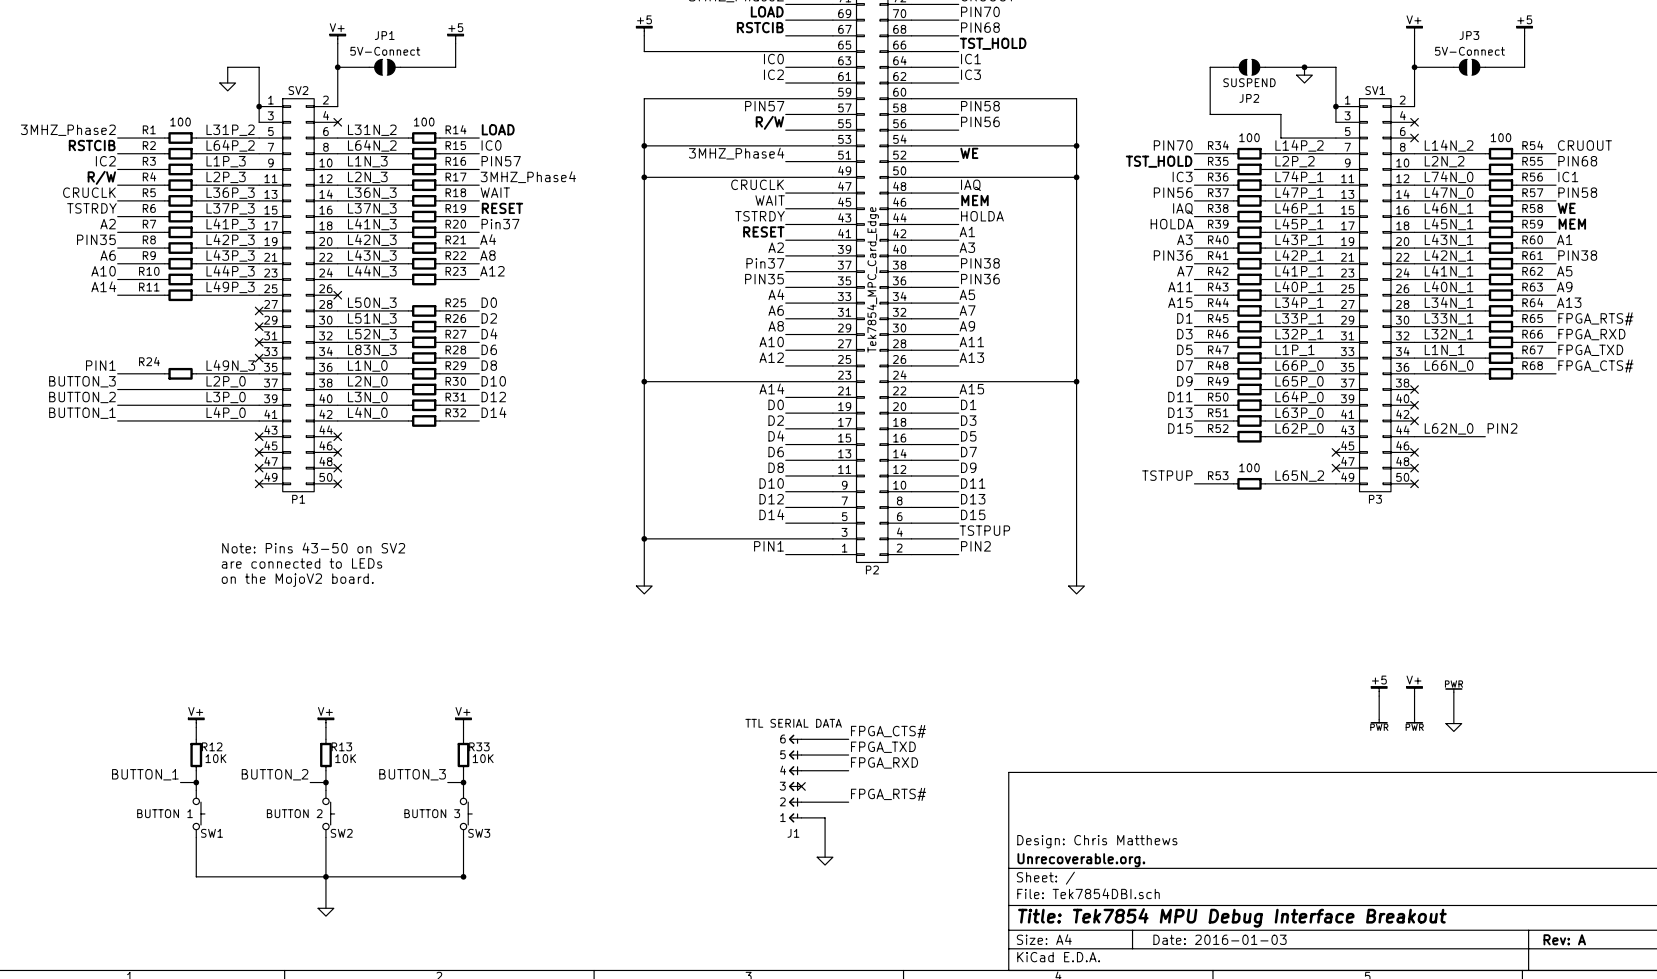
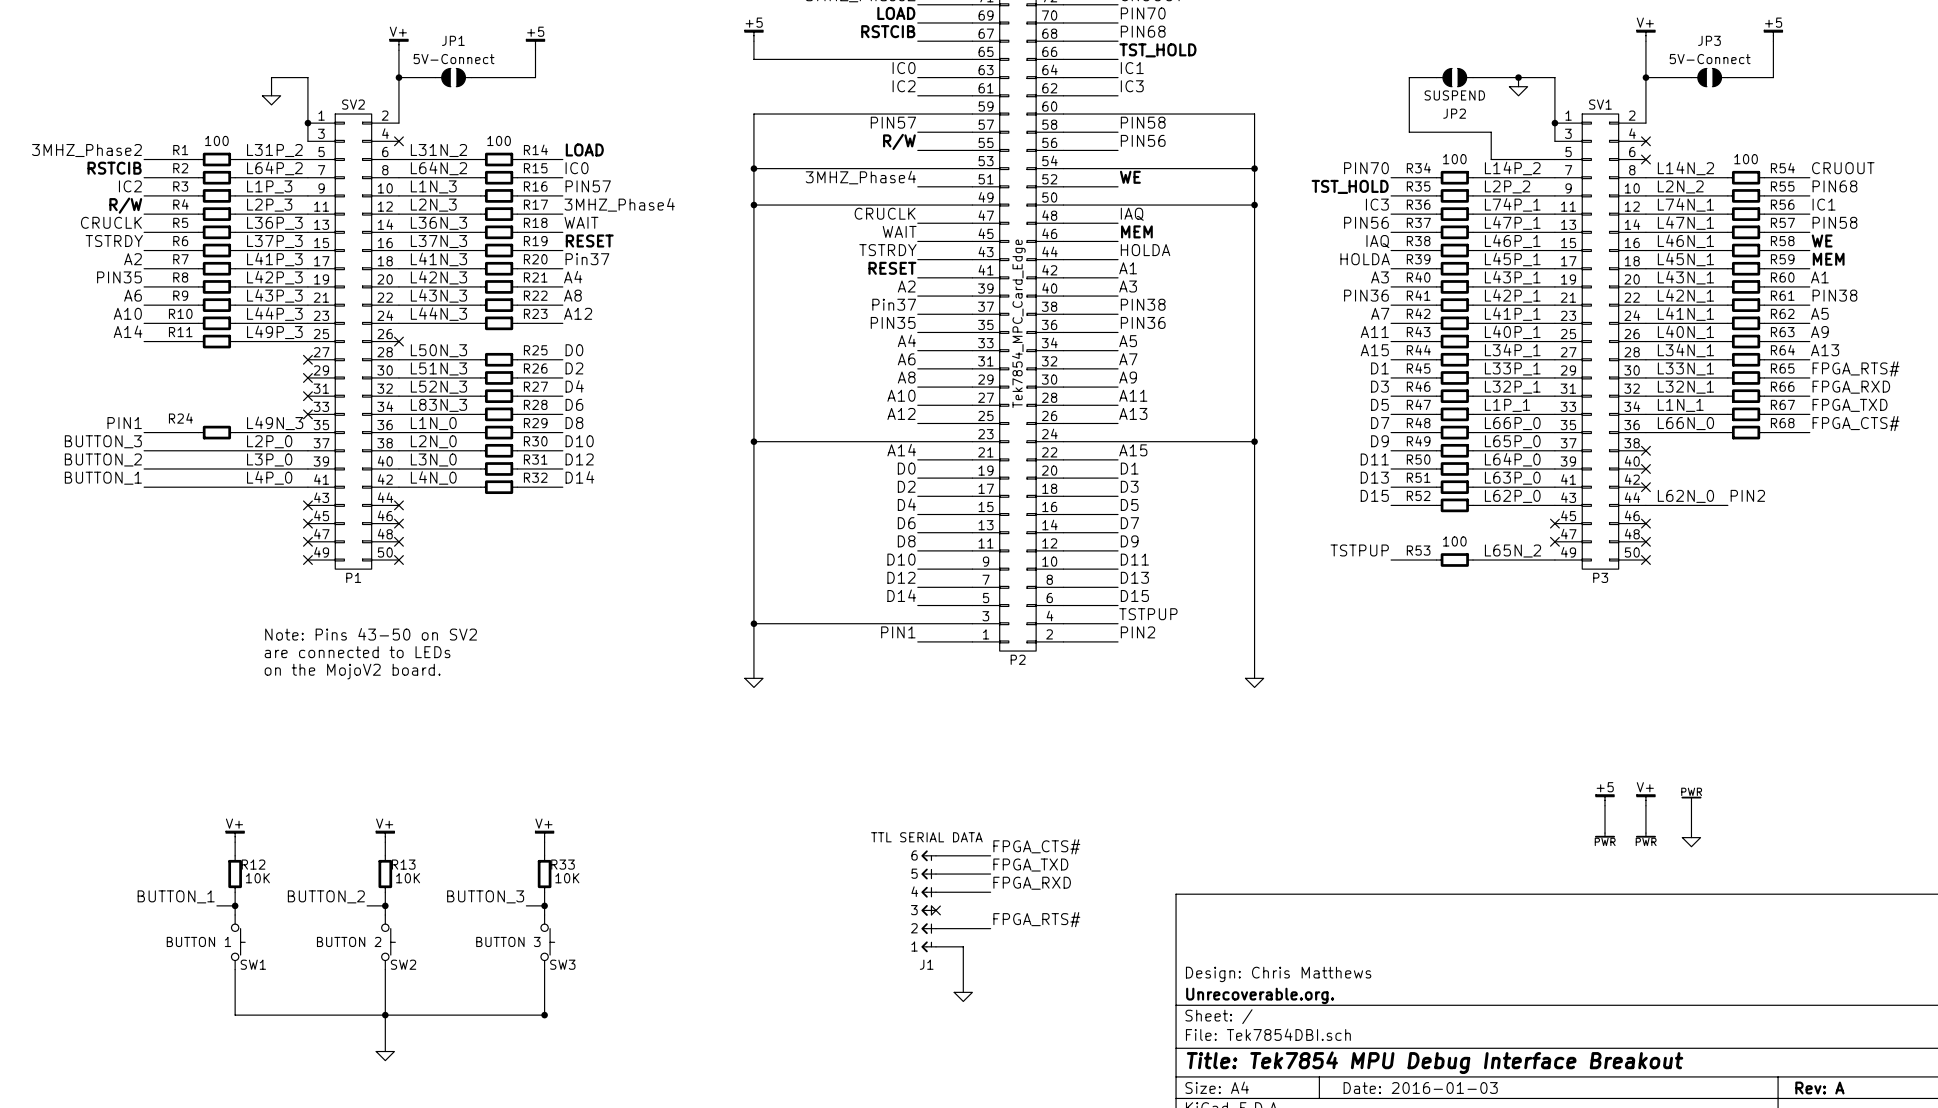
label: L74N_0 (1449, 177) -> L74N_1 (1685, 204)
label: L47N_0 (1449, 192) -> L47N_1 (1685, 223)

